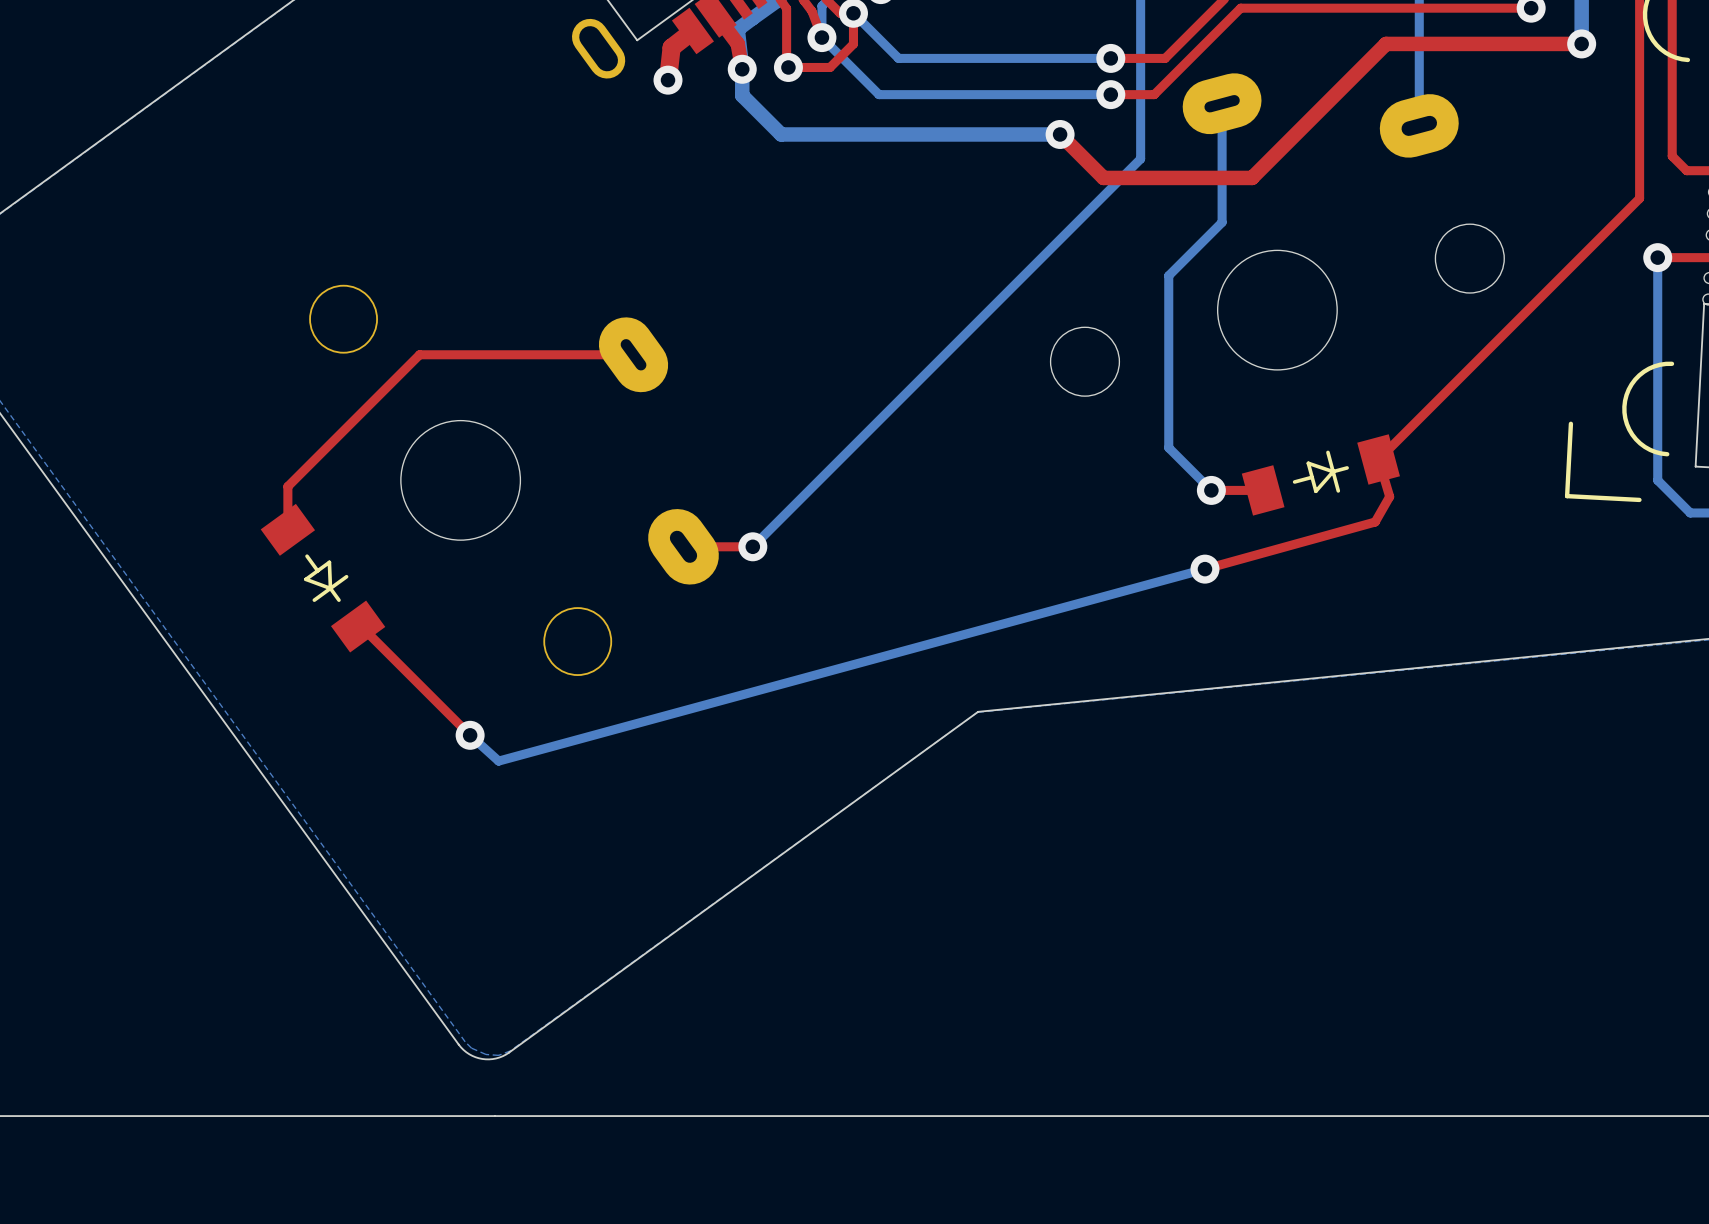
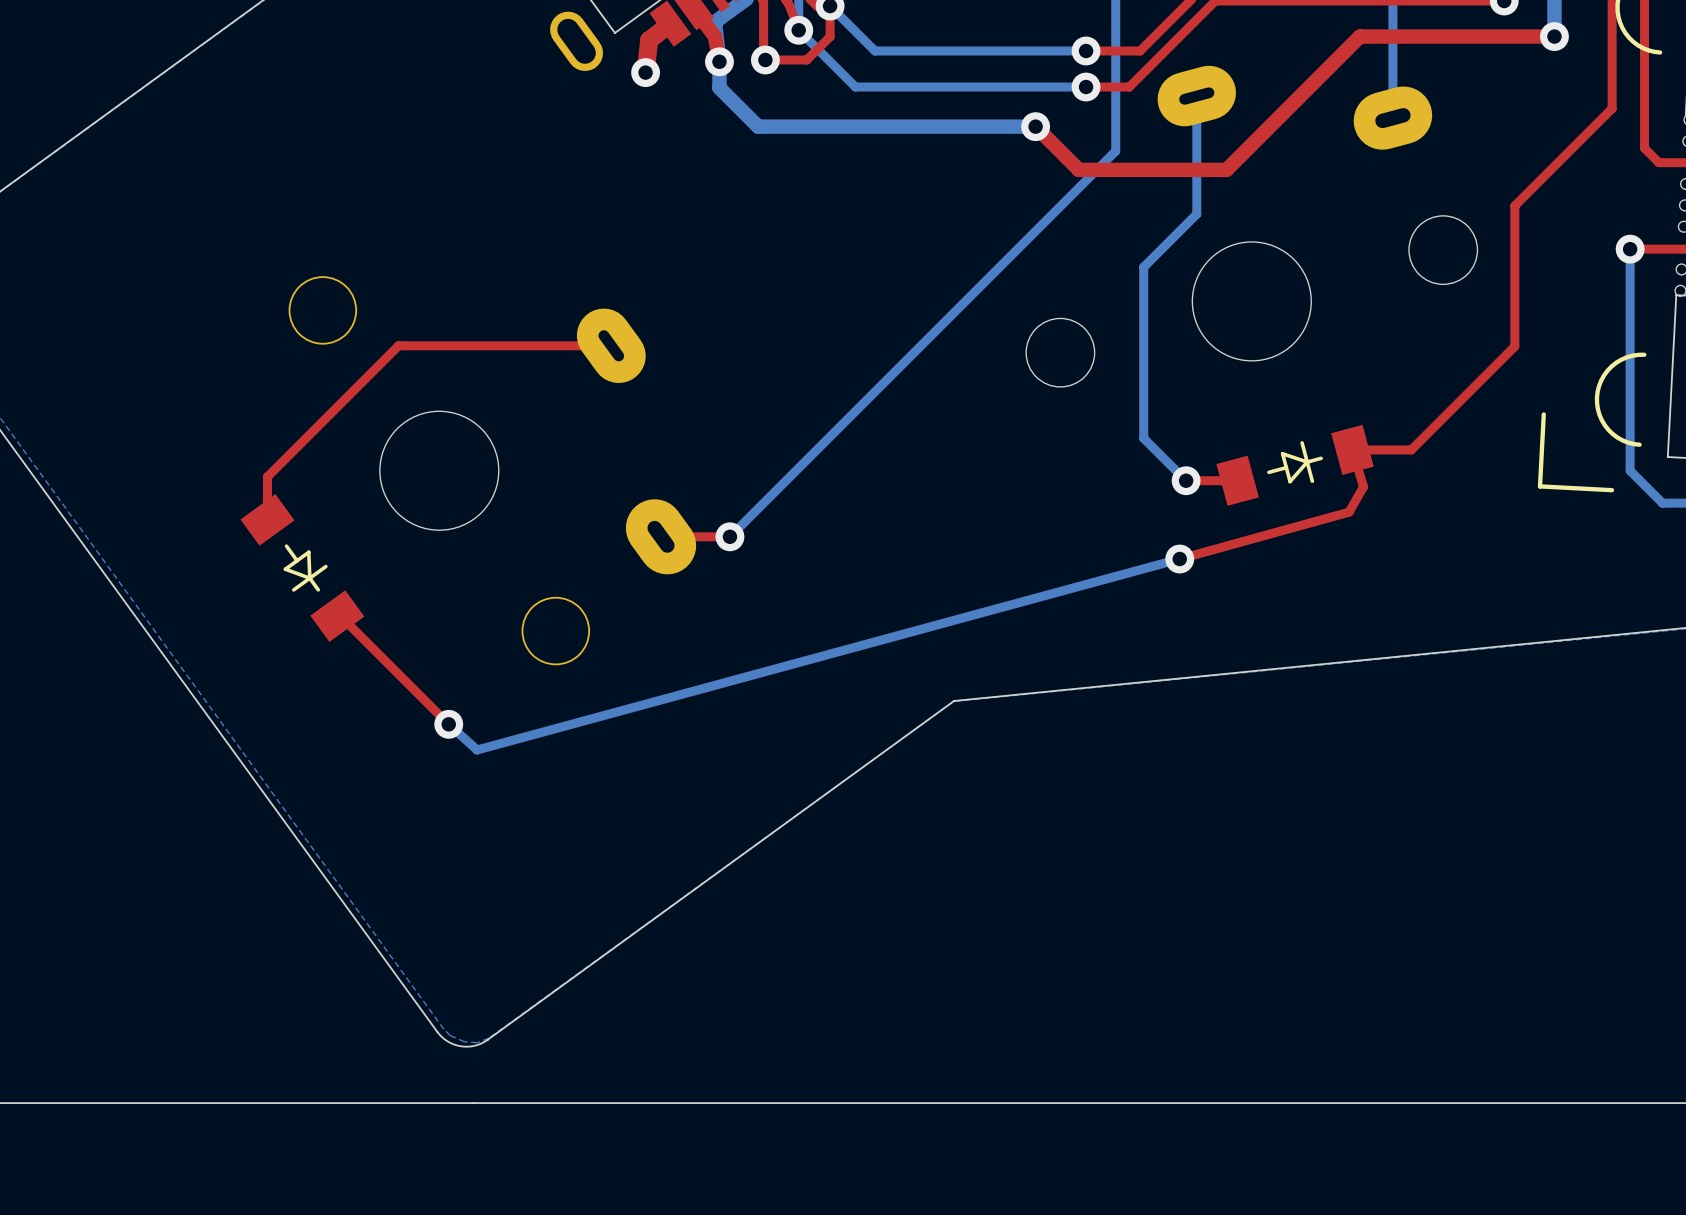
top track: (1639, 116) (1639, 198) (1378, 459) -> (1612, 108) (1514, 205) (1514, 346) (1411, 449) (1352, 449)

